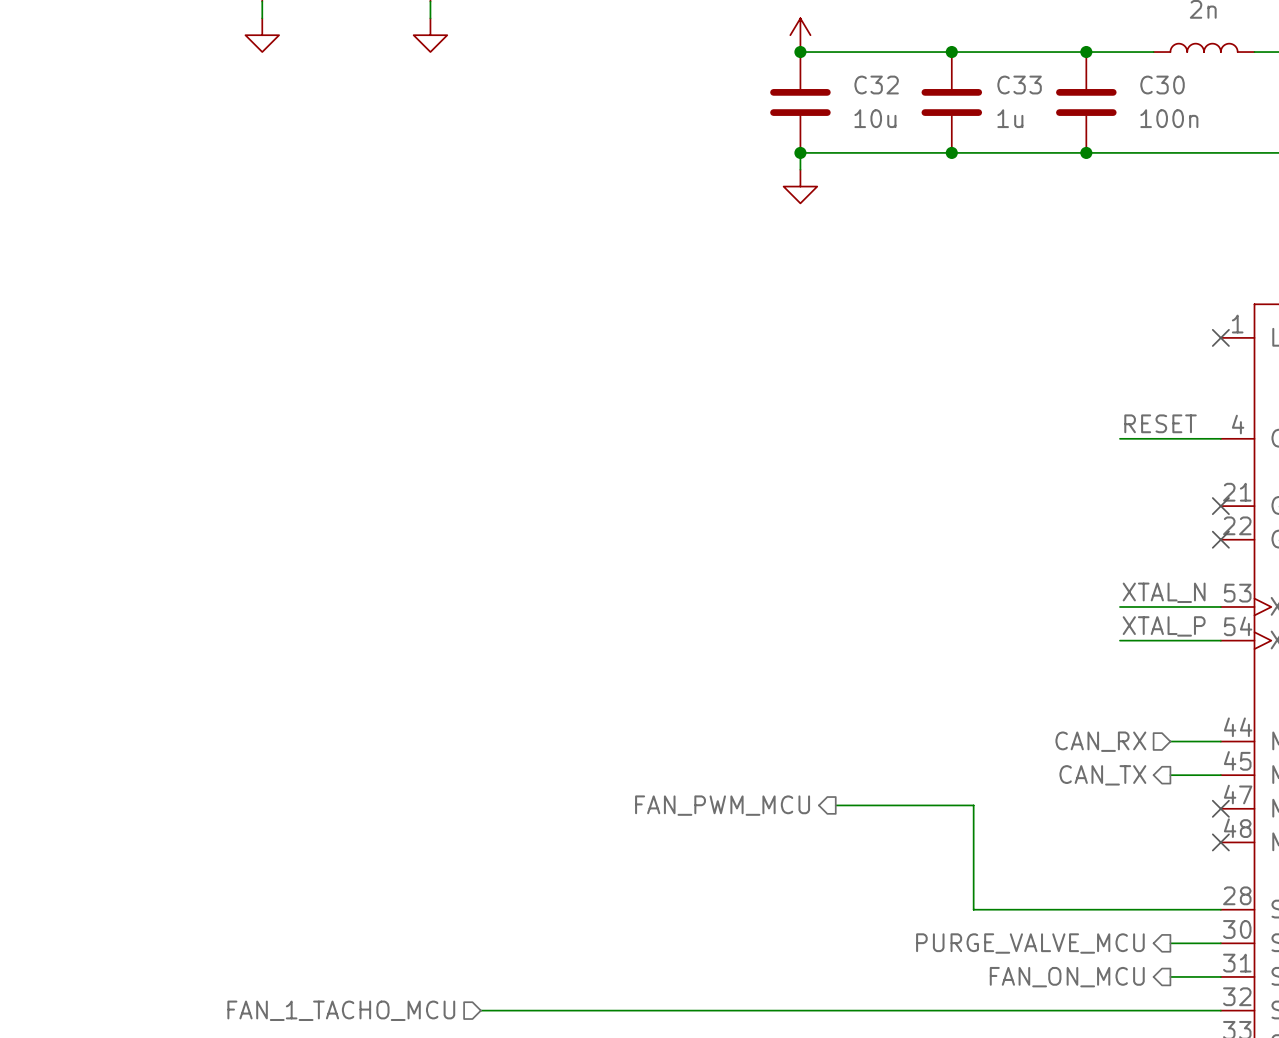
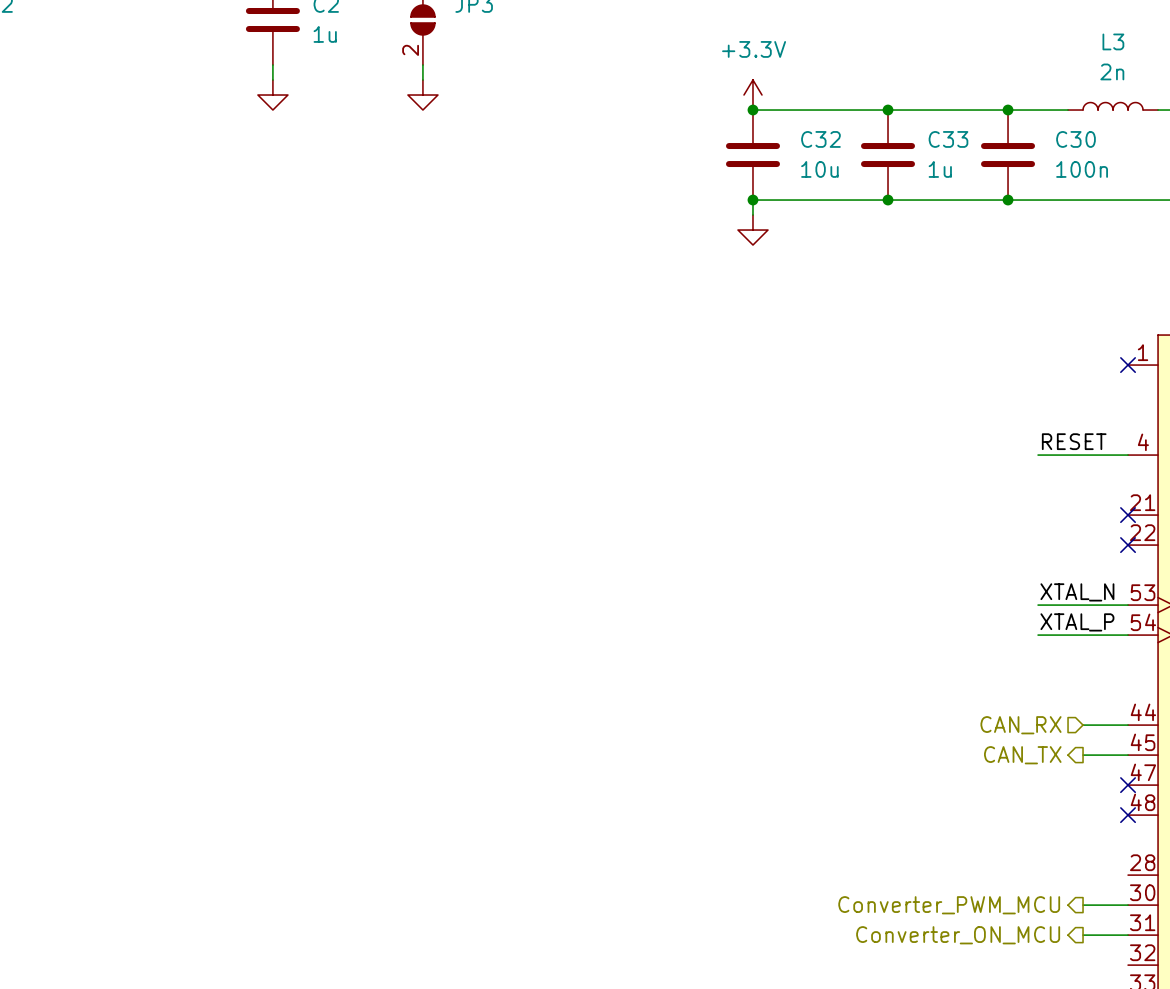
hierarchical label: FAN_PWM_MCU (722, 805) -> none
wire: (835, 805) (973, 805) (973, 909) (1220, 909) -> none
hierarchical label: PURGE_VALVE_MCU (1030, 943) -> Converter_PWM_MCU (949, 905)
hierarchical label: FAN_ON_MCU (1067, 977) -> Converter_ON_MCU (958, 935)
hierarchical label: FAN_1_TACHO_MCU (341, 1010) -> none
wire: (480, 1010) (1220, 1010) -> none

